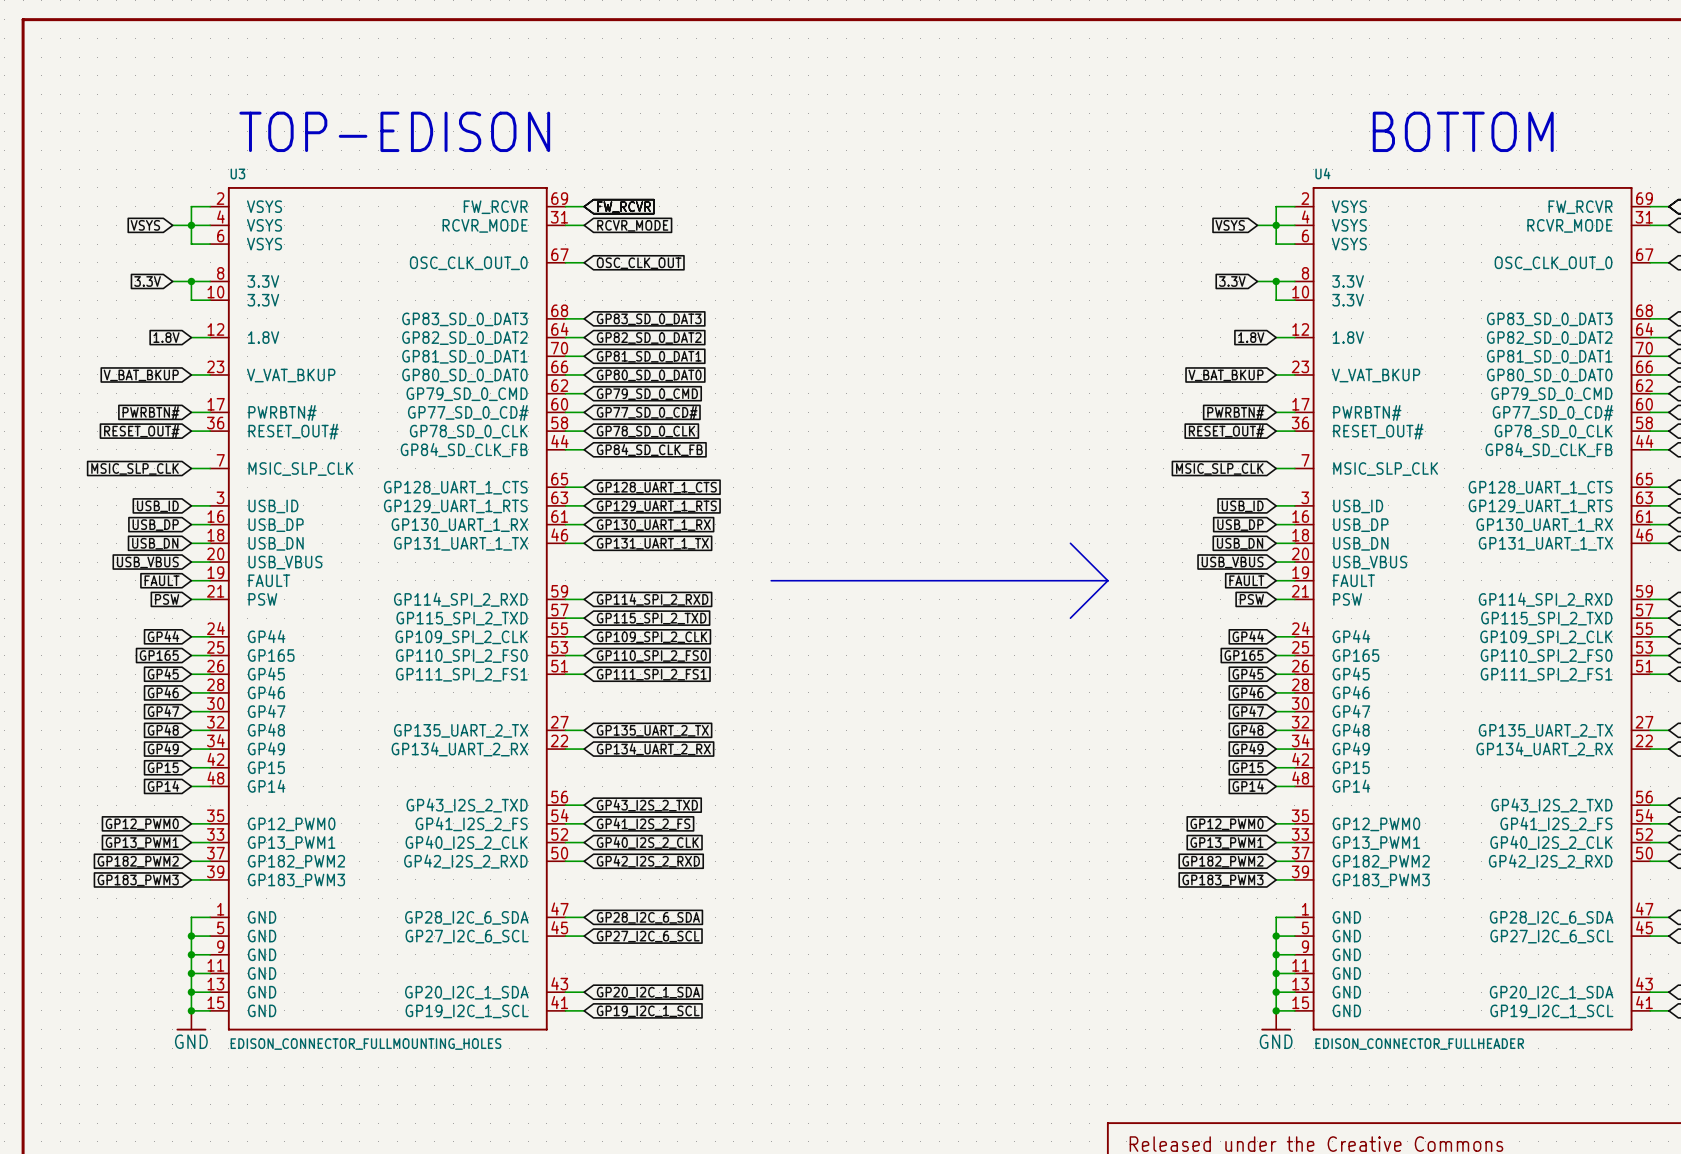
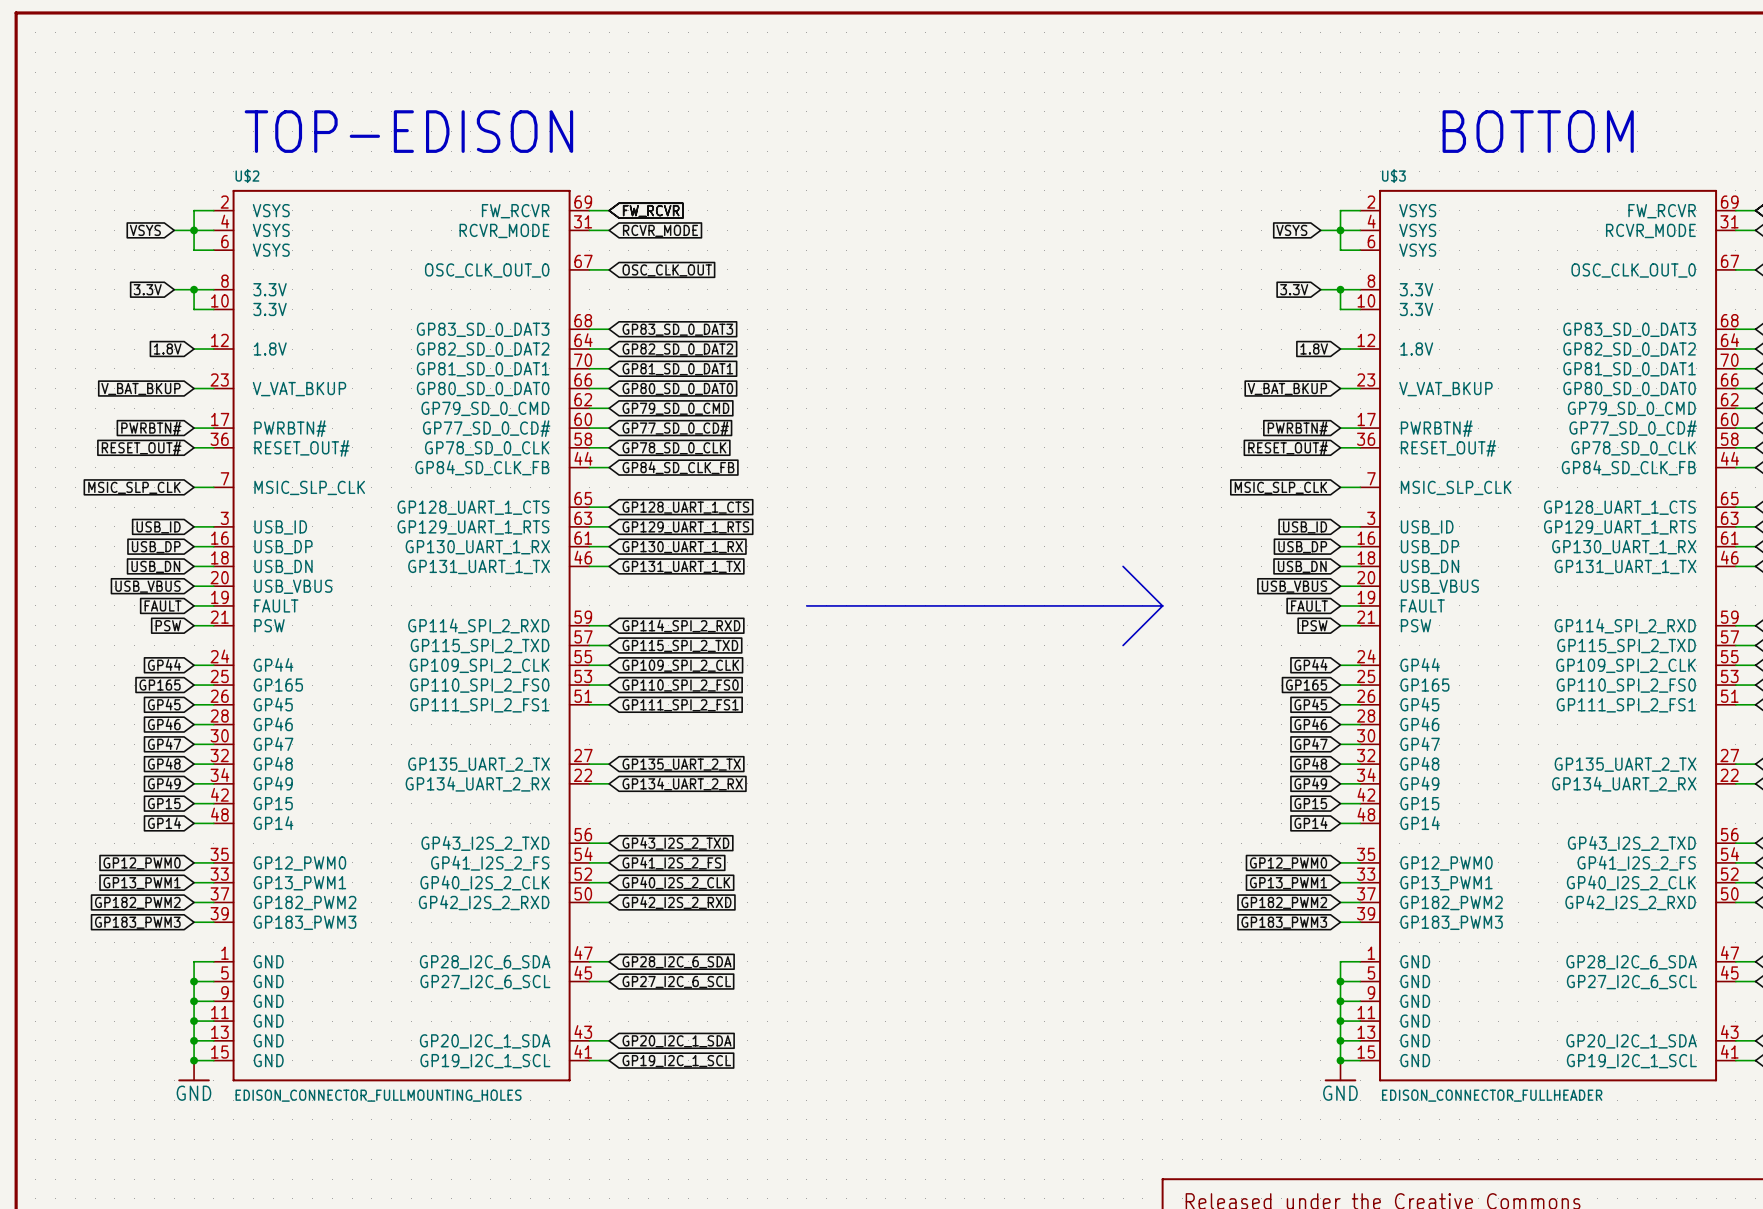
U3 name: U3 (237, 173) -> U$2 (247, 176)
U4 name: U4 (1322, 173) -> U$3 (1393, 176)

